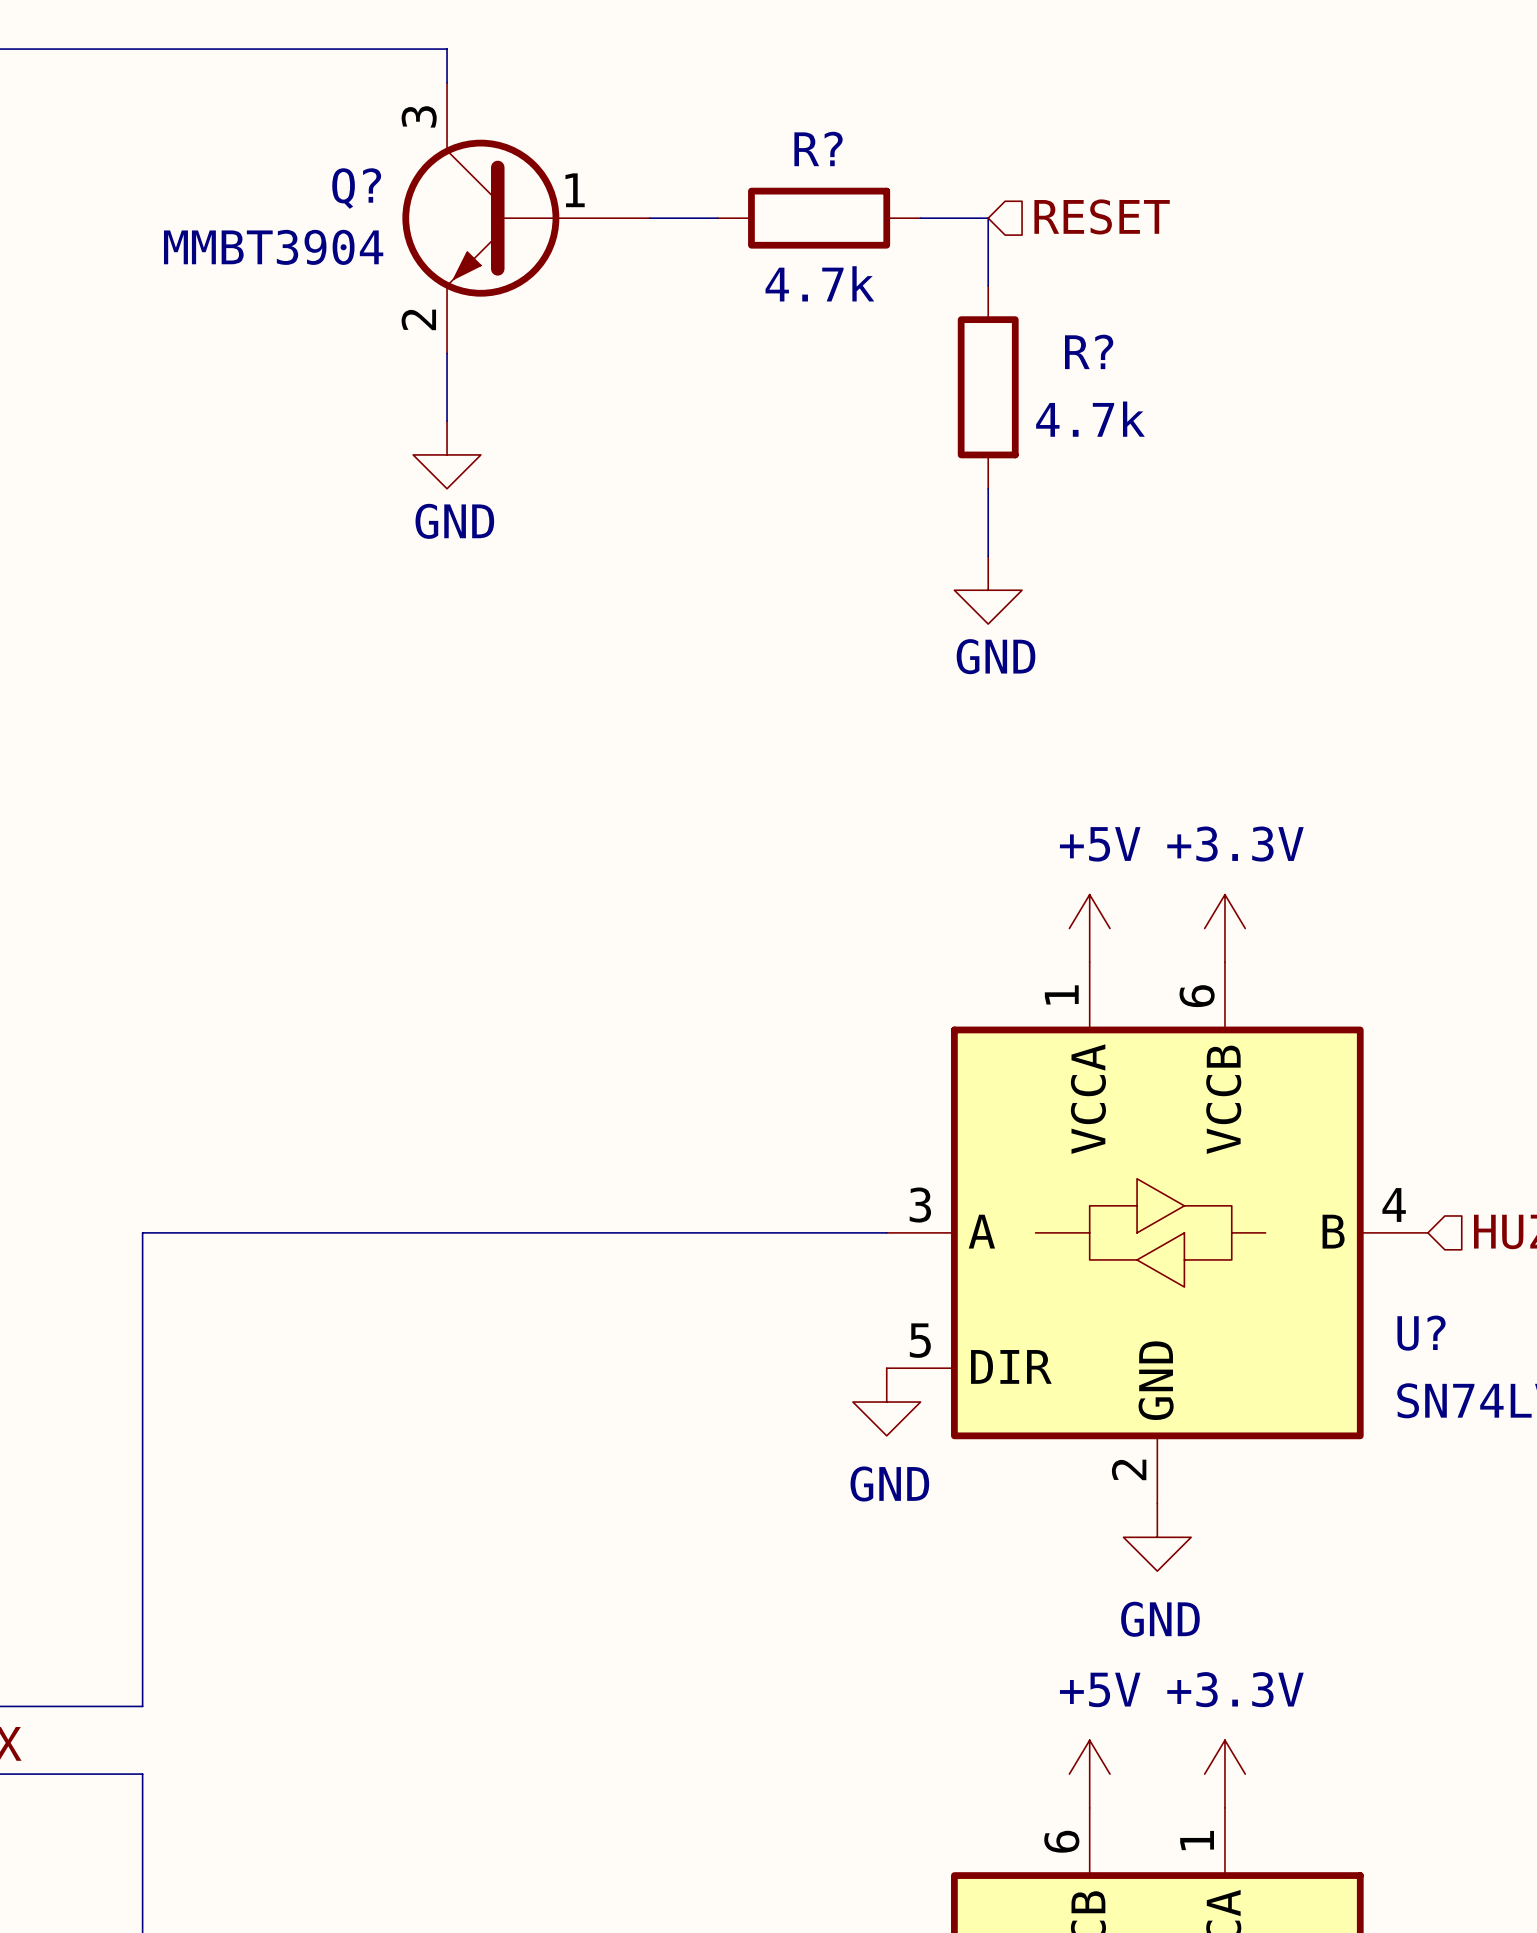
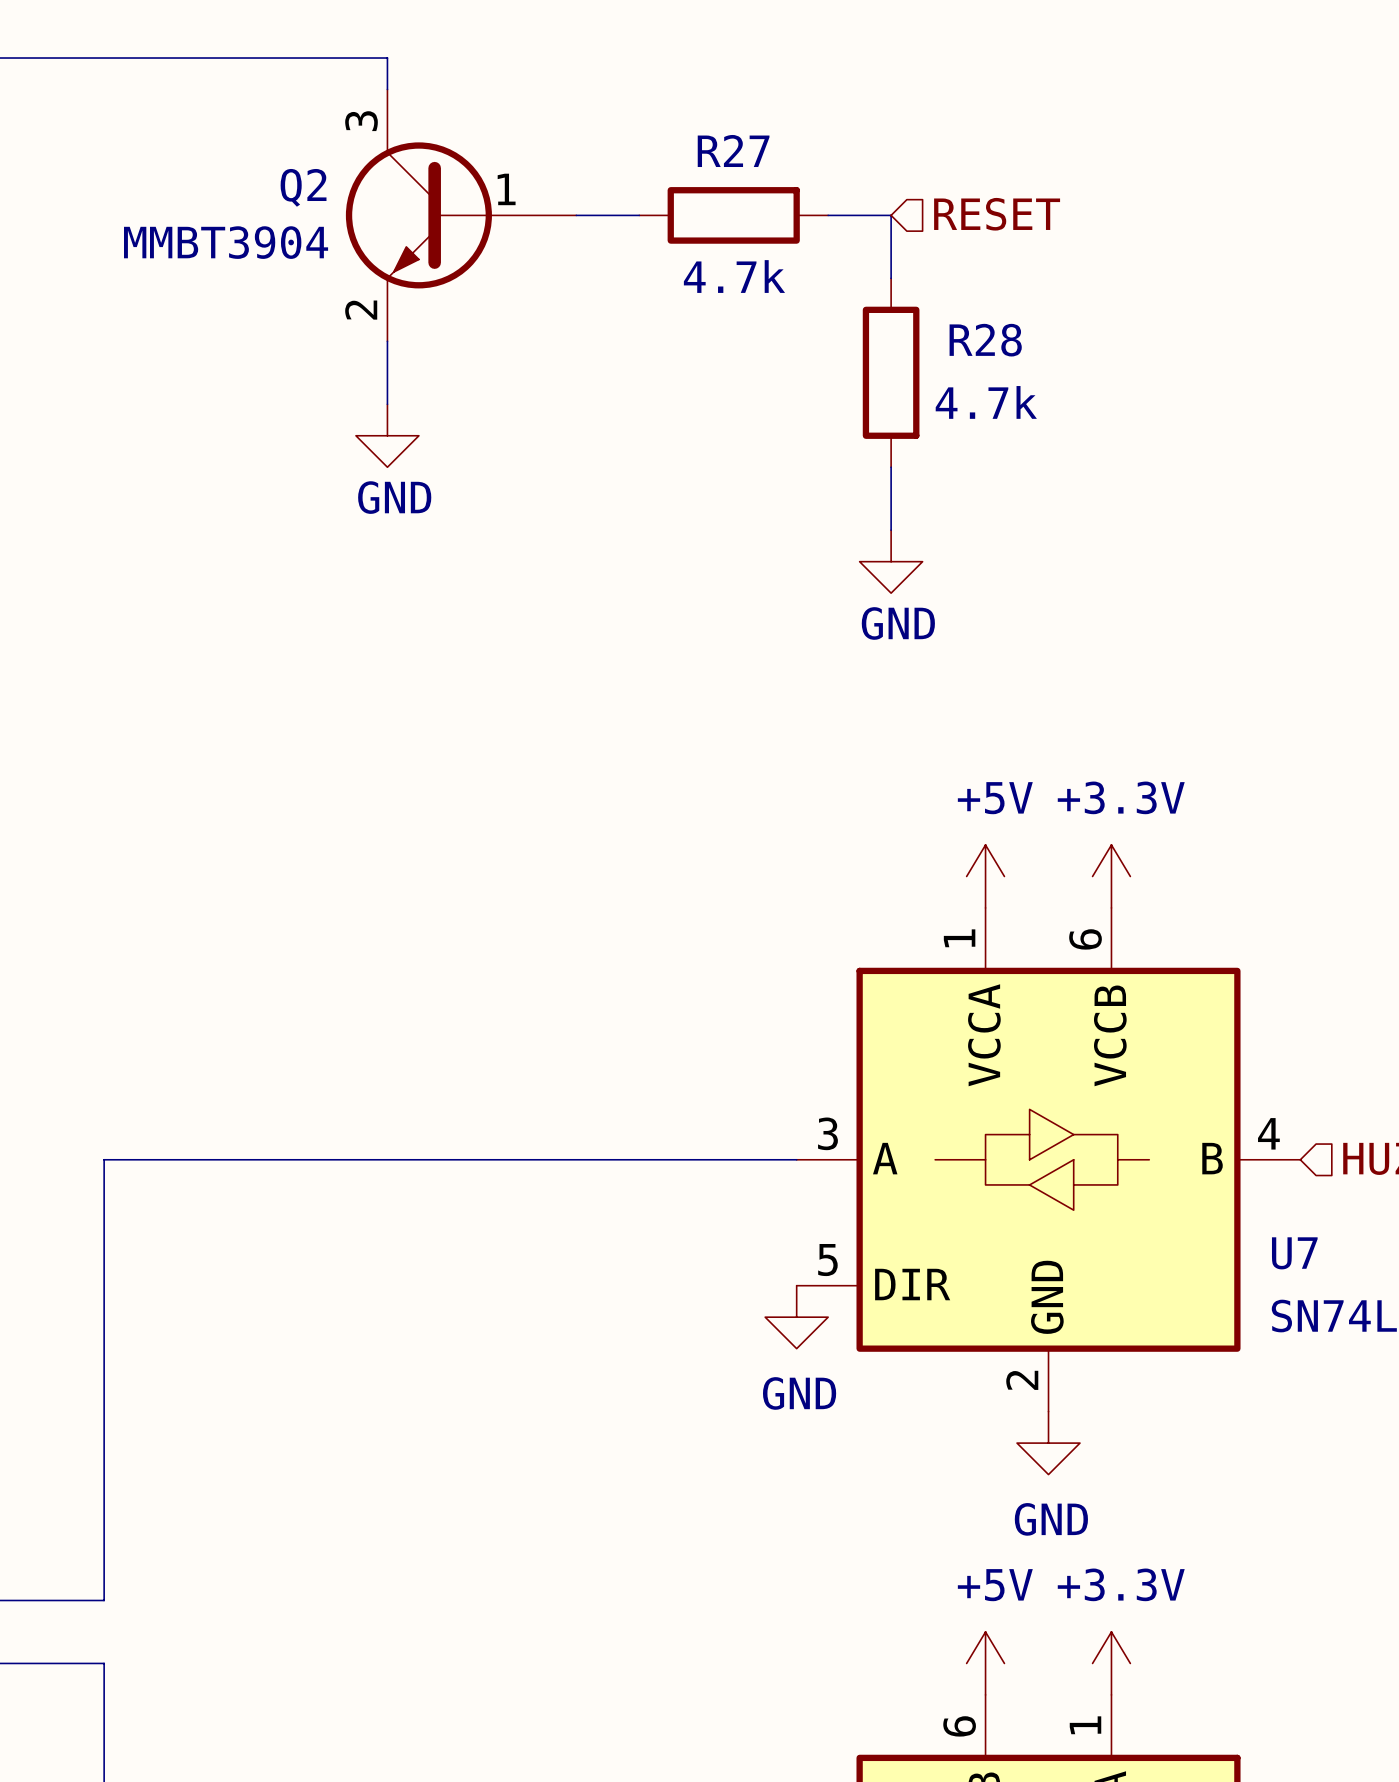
R? name: R? (818, 148) -> R27 (733, 150)
Q? name: Q? (356, 188) -> Q2 (303, 187)
R? name: R? (1089, 351) -> R28 (985, 340)
U? name: U? (1421, 1333) -> U7 (1294, 1253)

